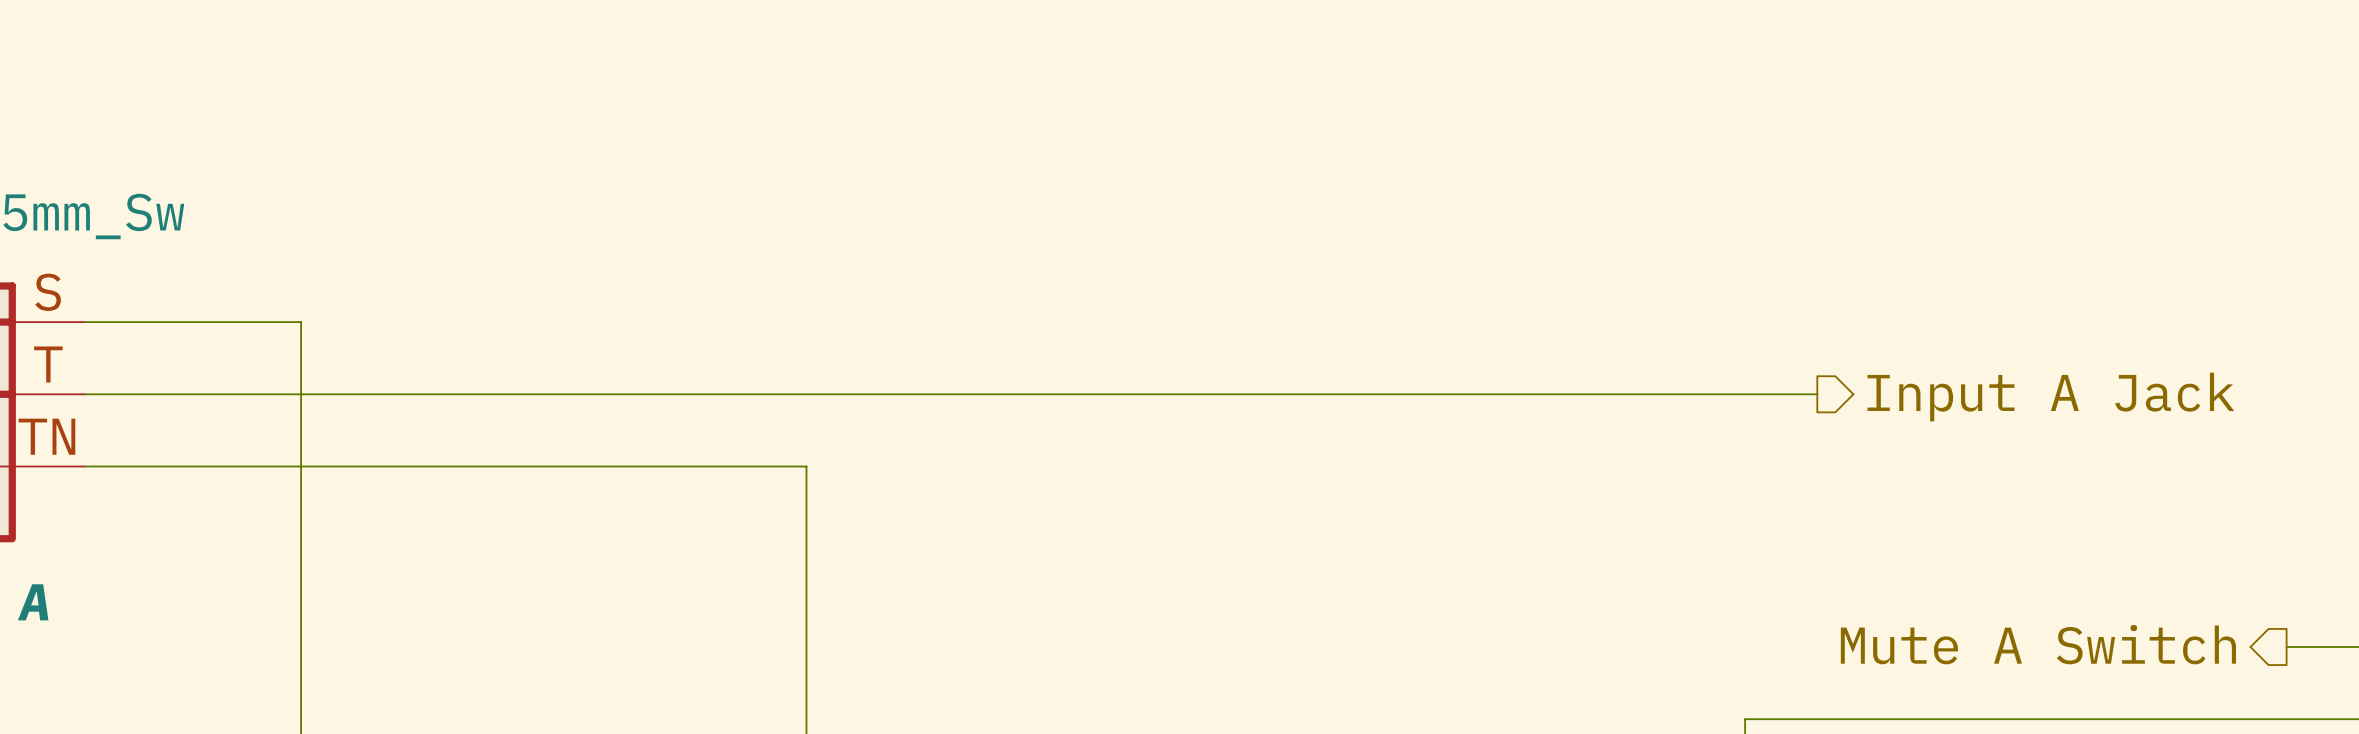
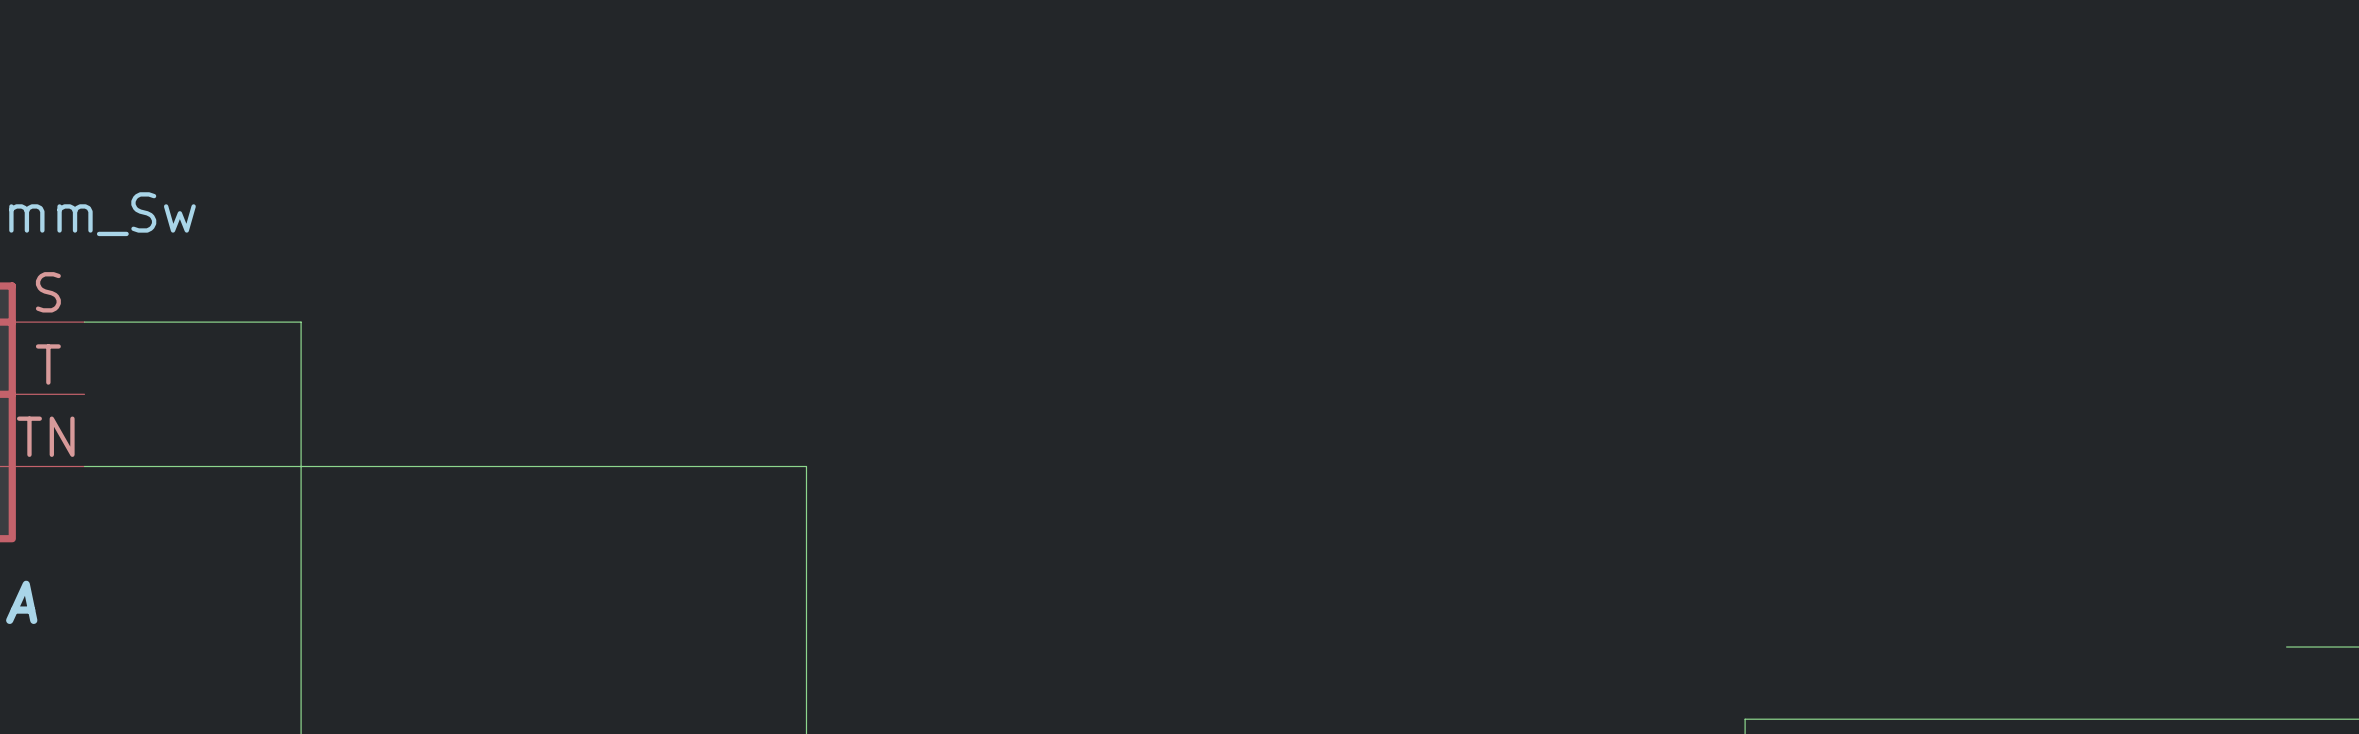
wire: (84, 394) (1817, 394) -> none
hierarchical label: Input A Jack (2050, 397) -> none
hierarchical label: Mute A Switch (2038, 644) -> none

